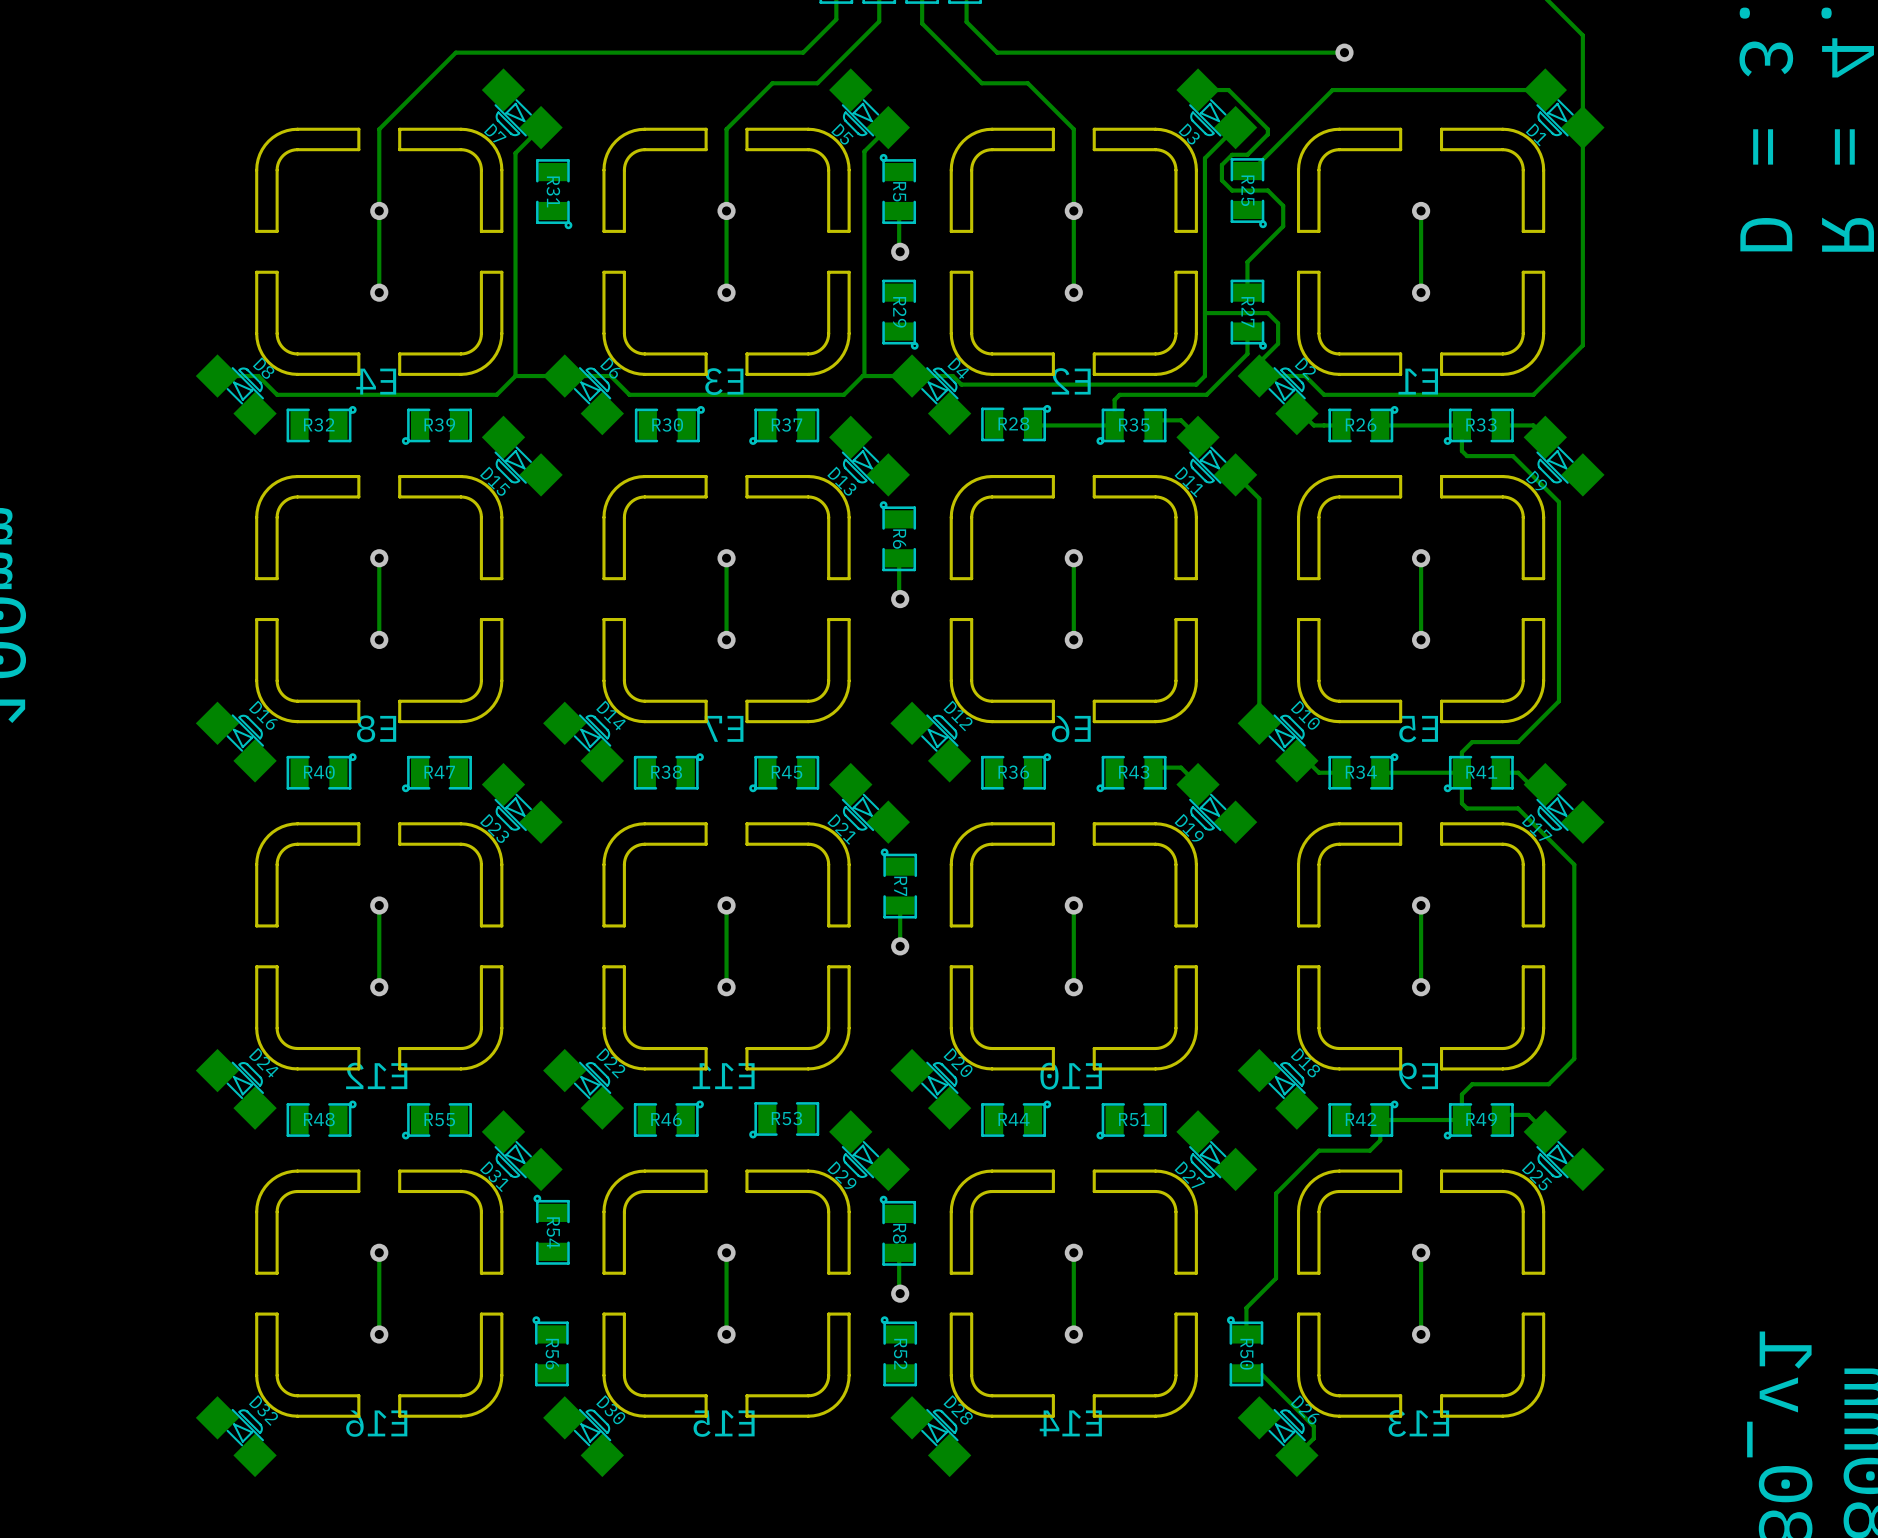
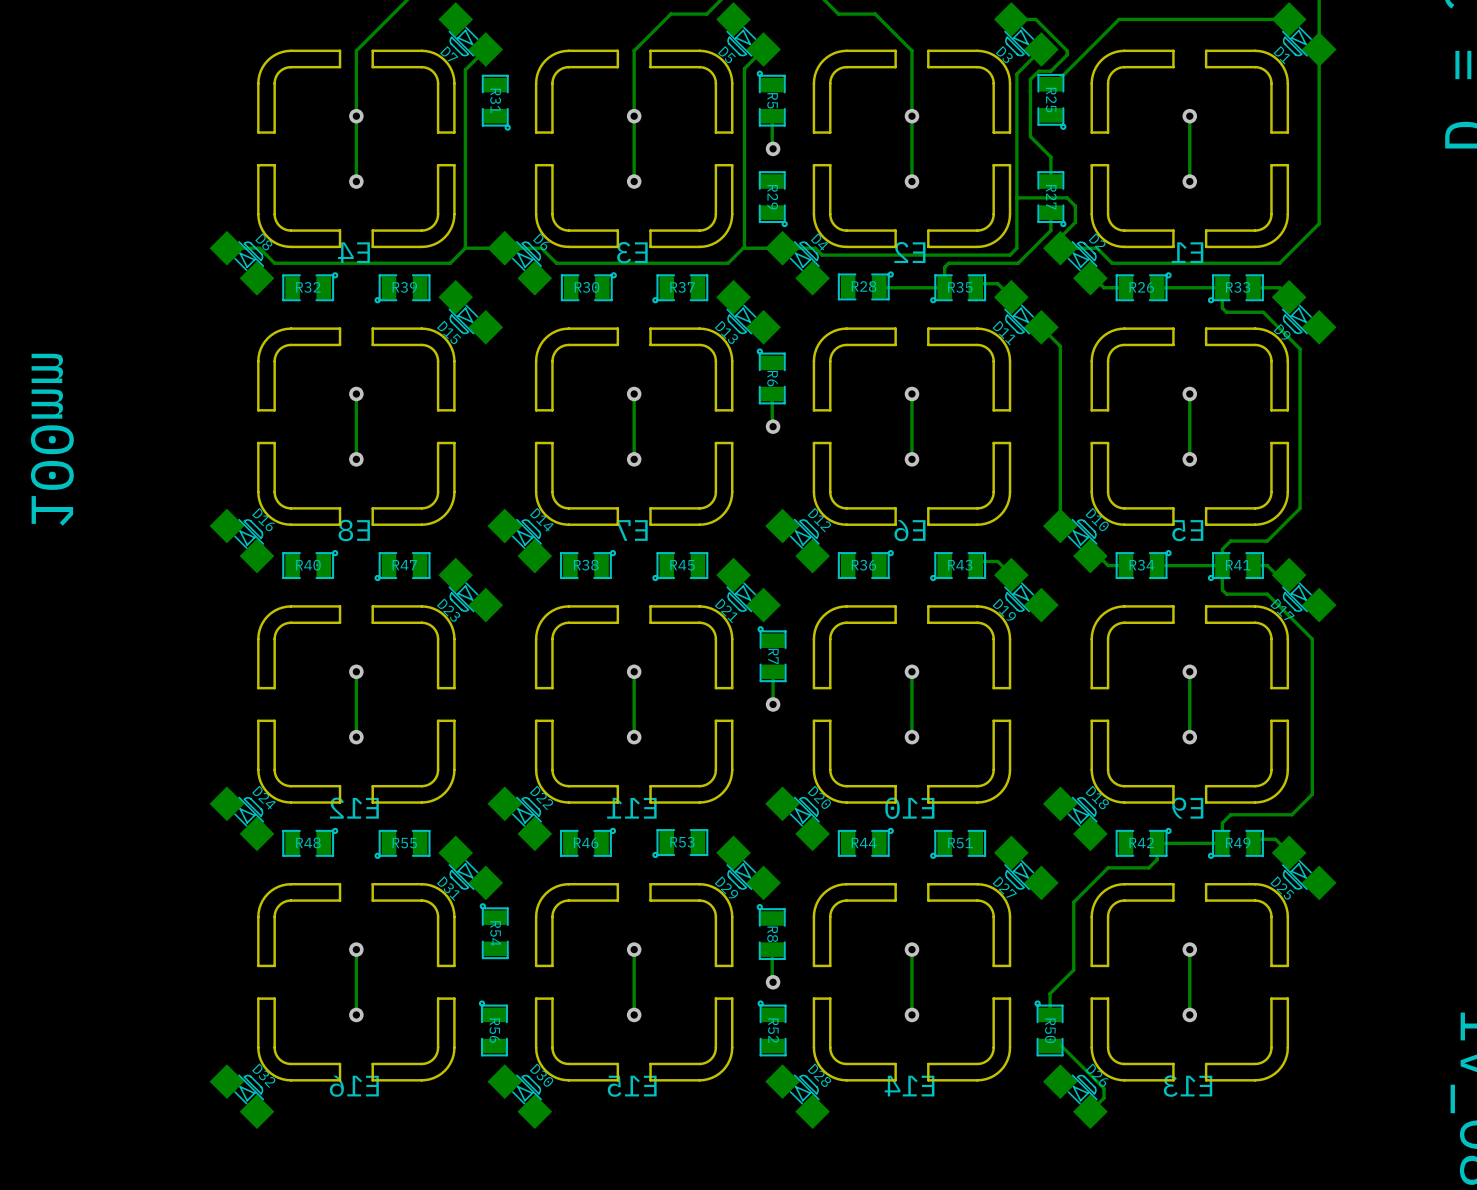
track: (1221, 180) (1232, 190) (1267, 190) (1283, 205) (1283, 226) (1247, 262) -> (1030, 91) (1030, 136) (1050, 157)

